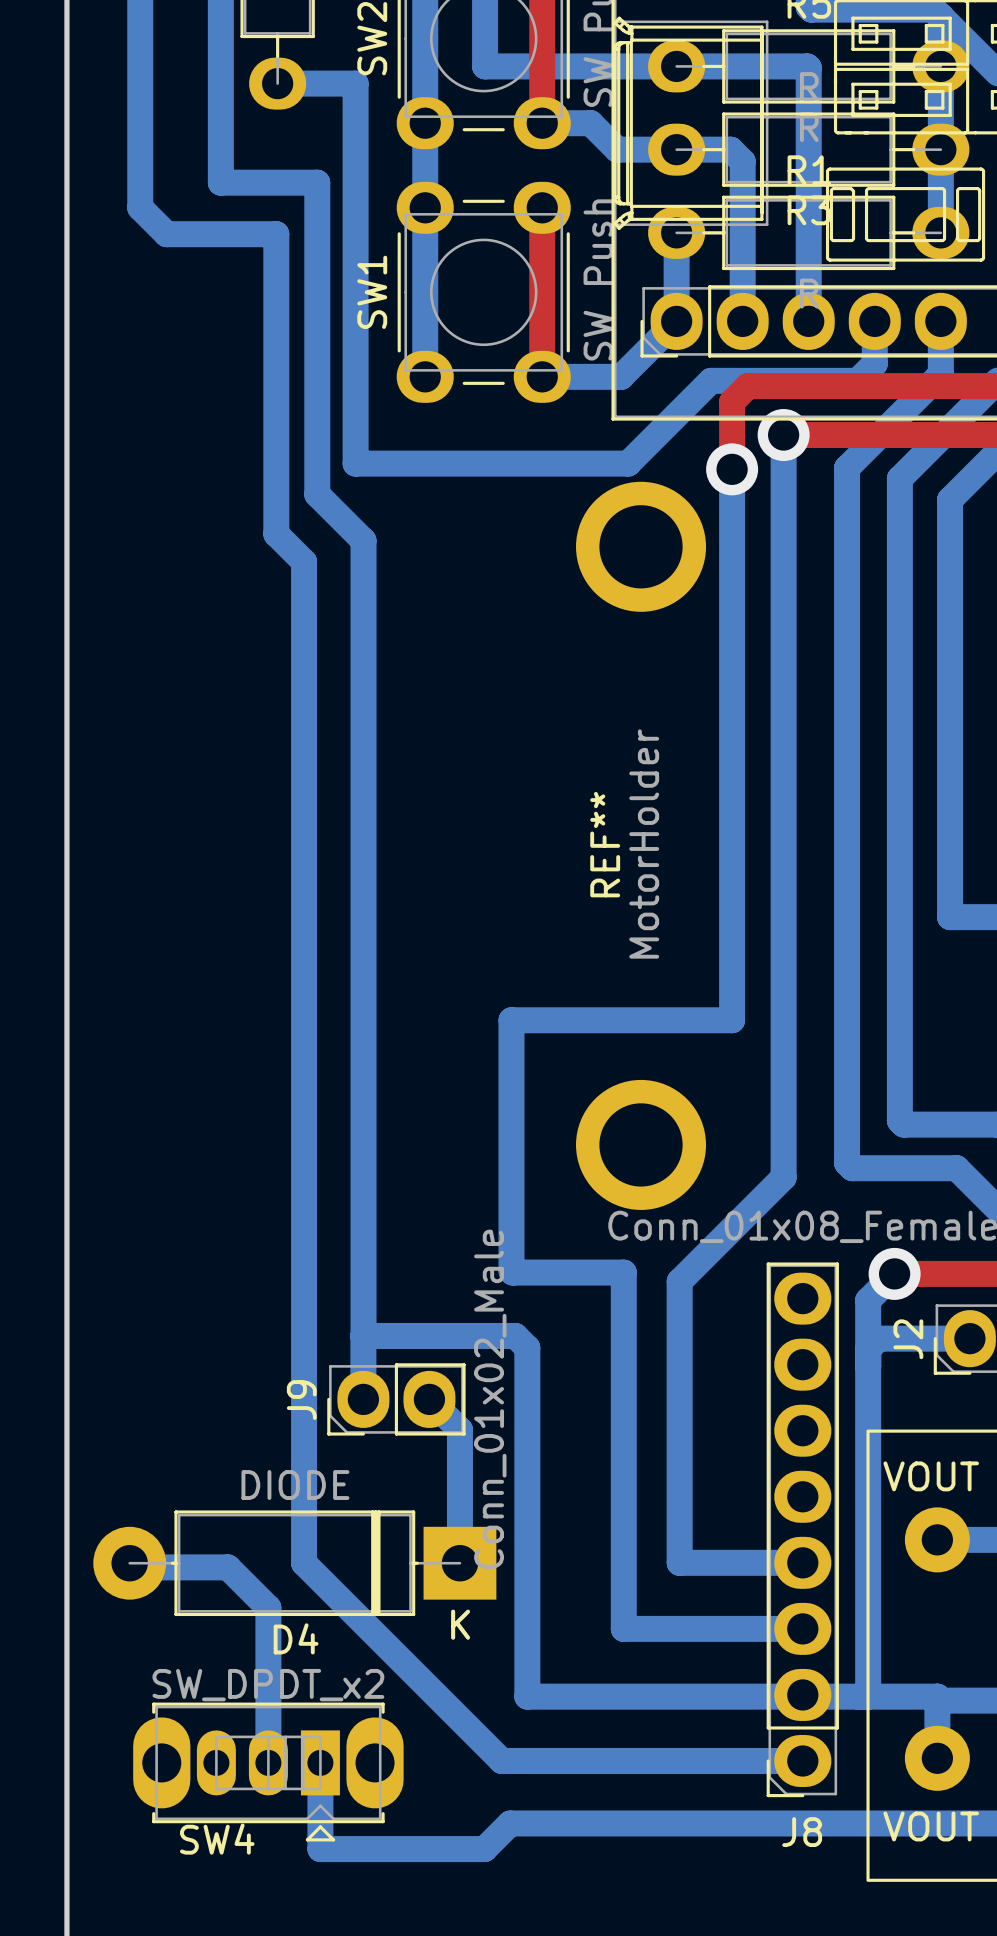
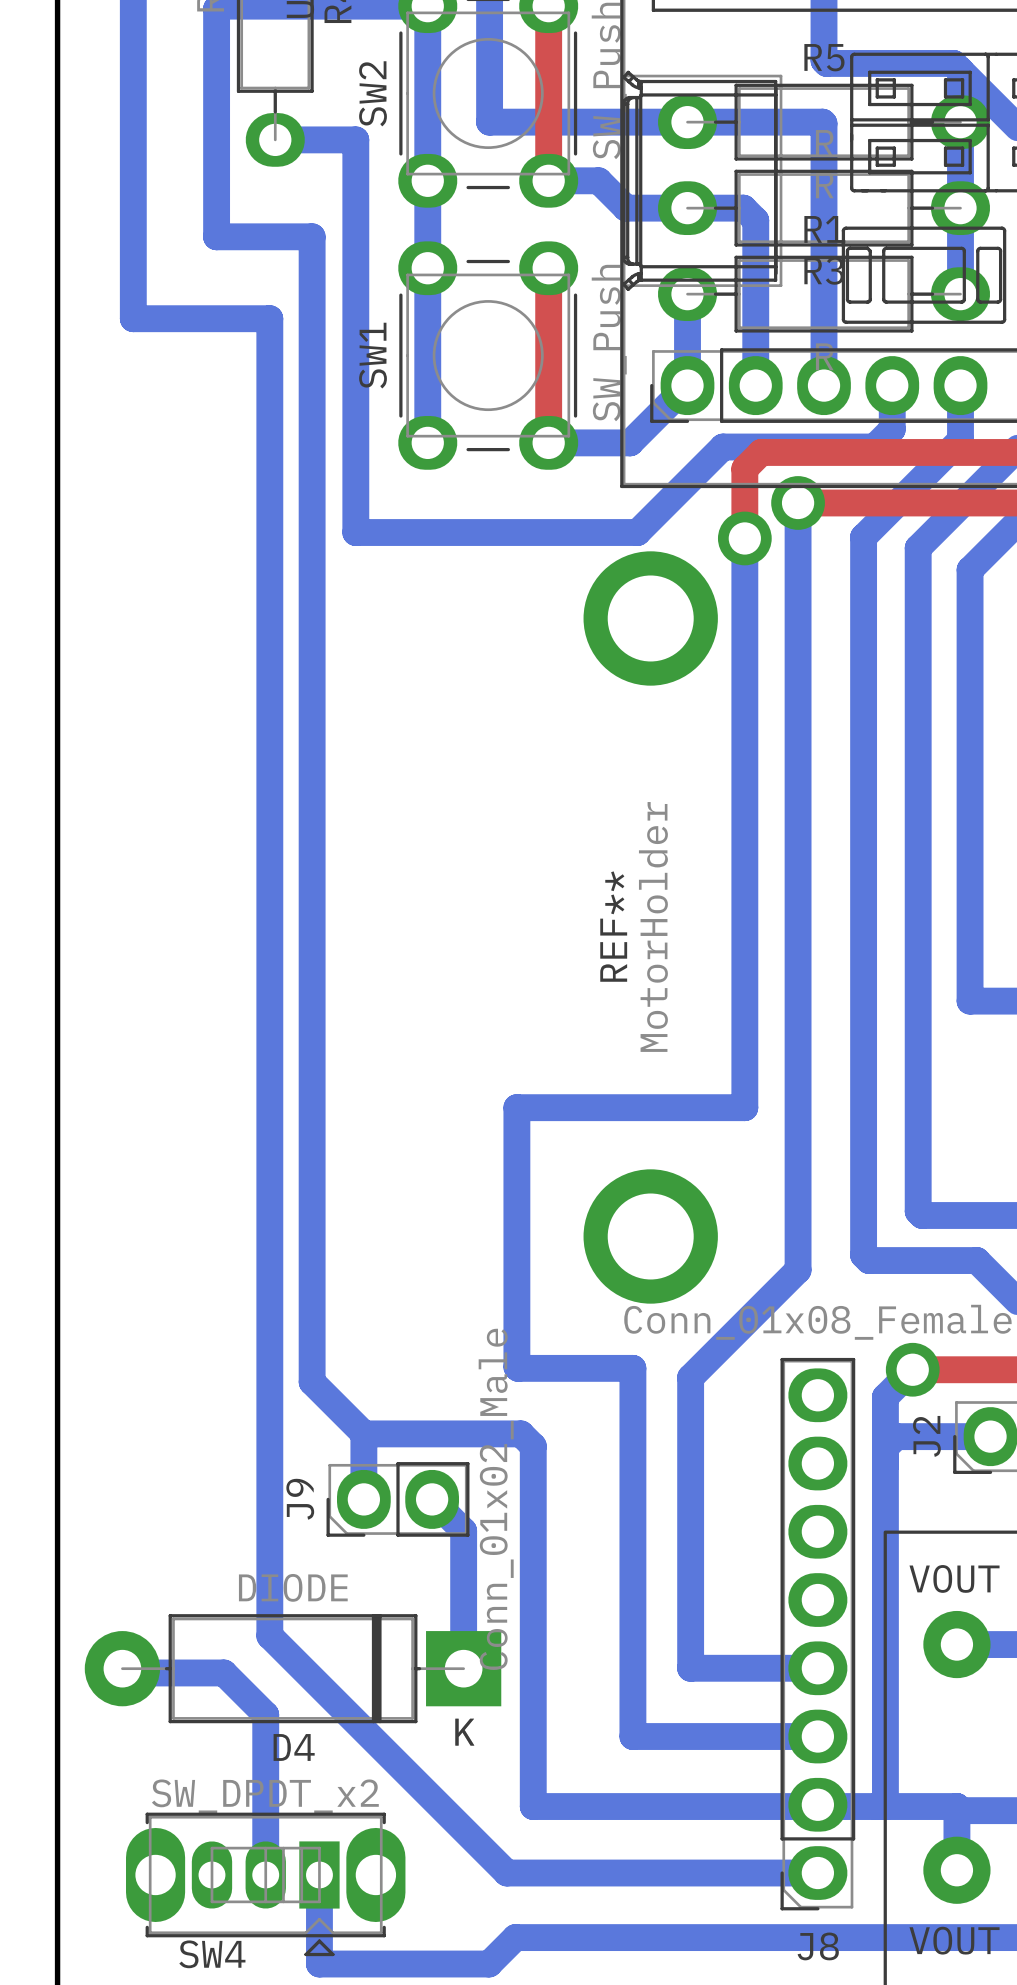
bottom track: (220, 177) (220, 182) (317, 182) (317, 494) (363, 540) (363, 1336) -> (216, 236) (312, 236) (312, 1382) (364, 1433)
bottom track: (140, 207) (166, 234) (276, 234) (276, 534) (304, 561) (304, 1563) -> (133, 268) (133, 318) (269, 318) (269, 1635) (302, 1668)

